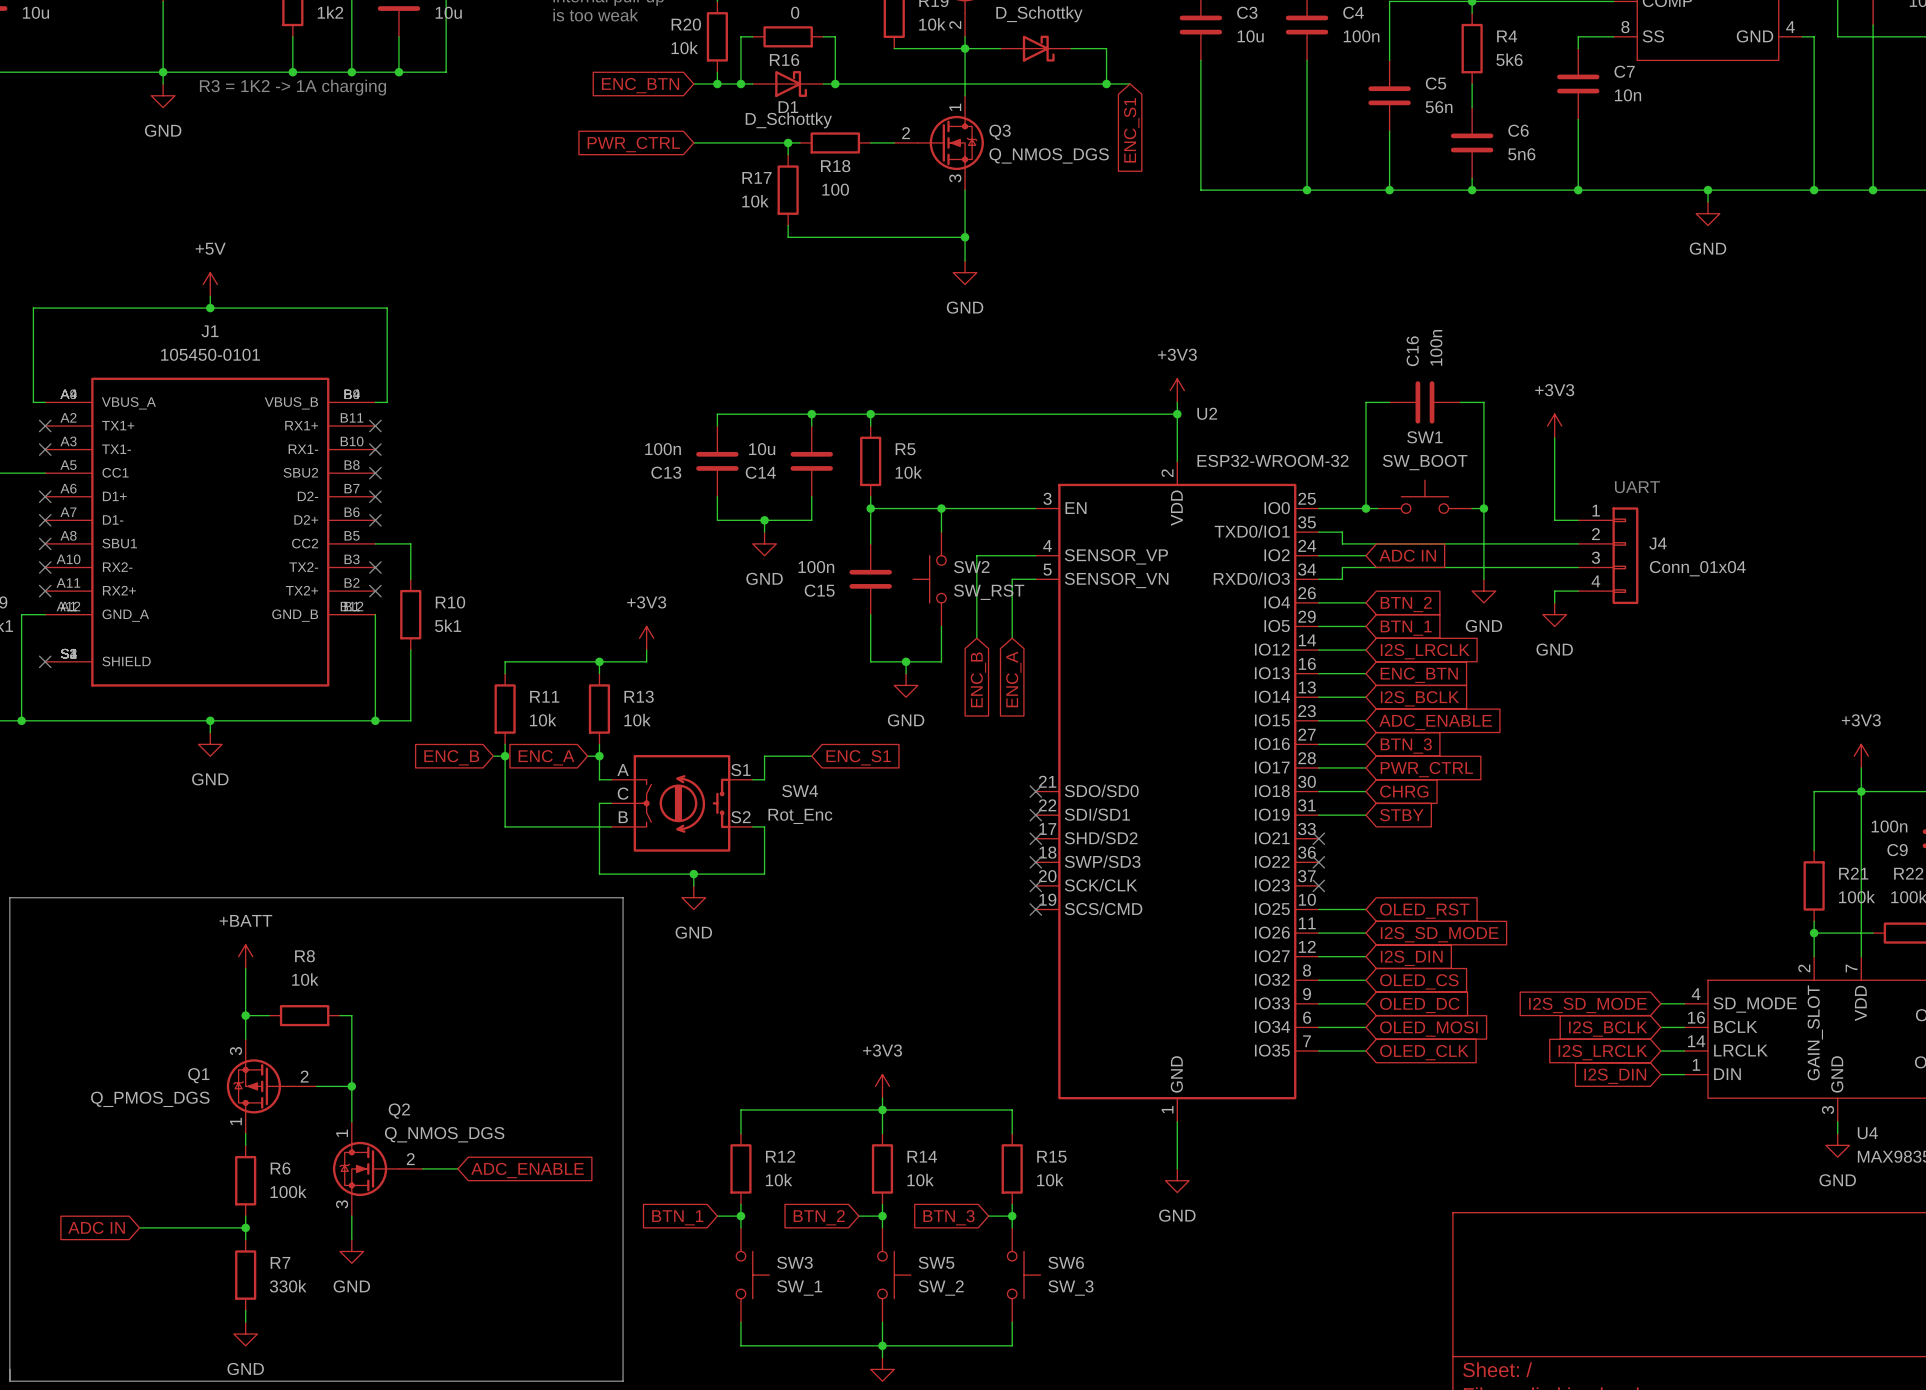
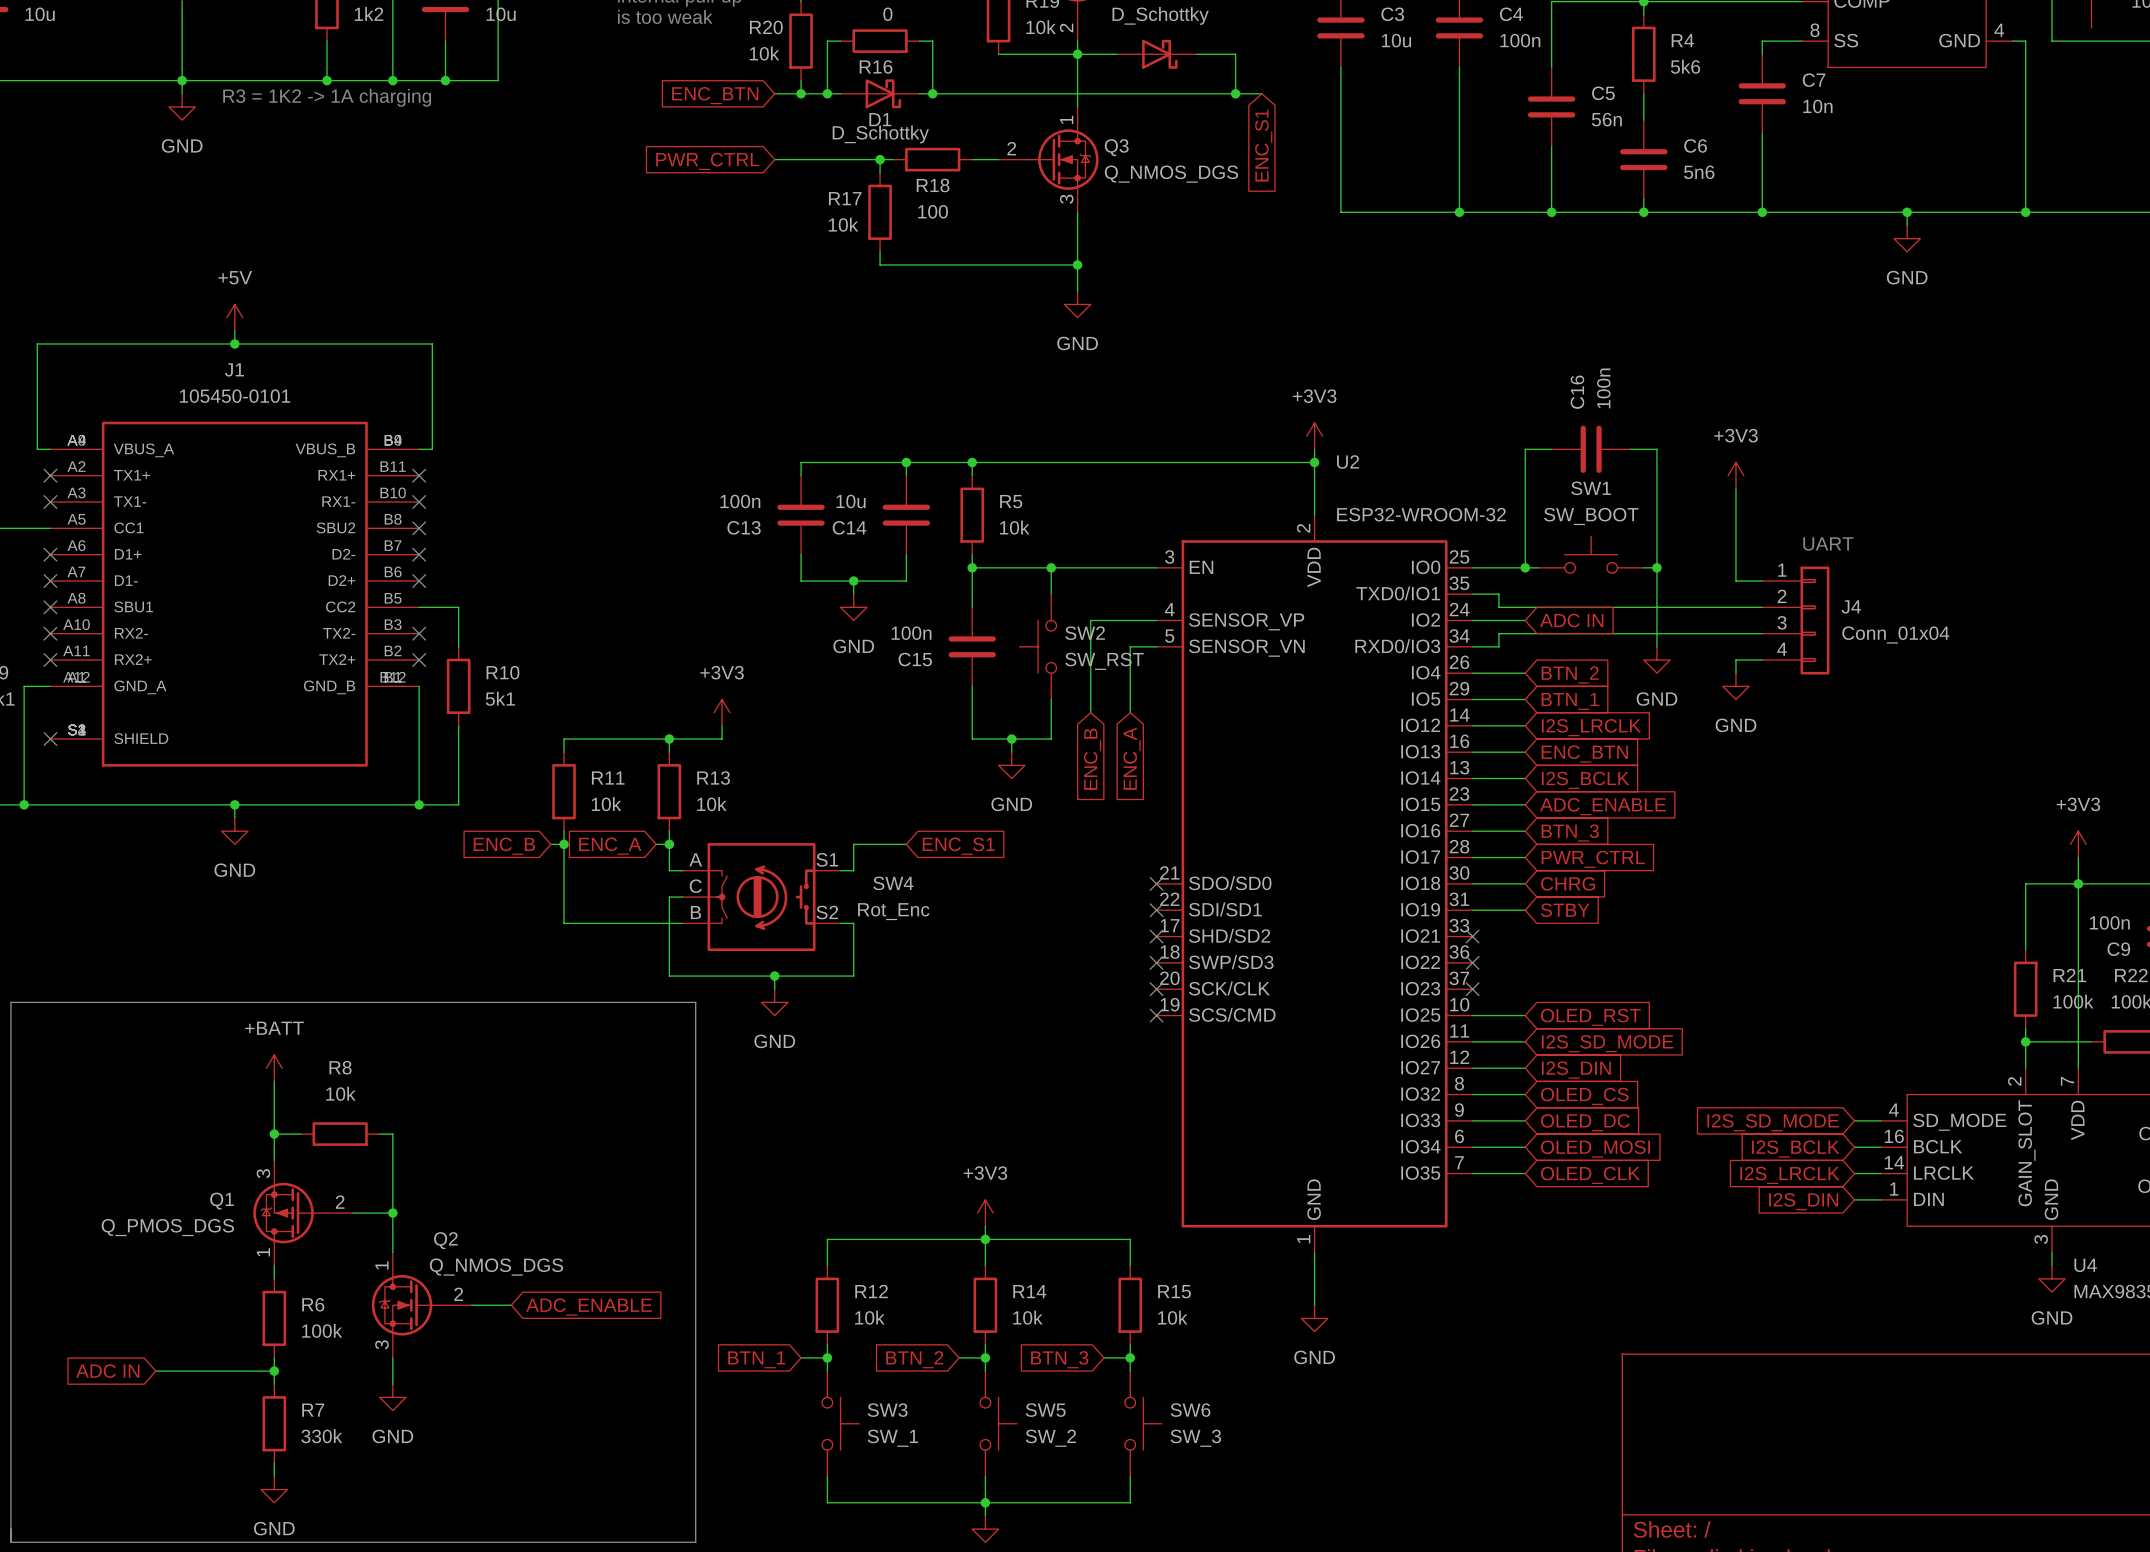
wire: (1873, 25) (1873, 190) -> none
junction: (1873, 190) -> none

